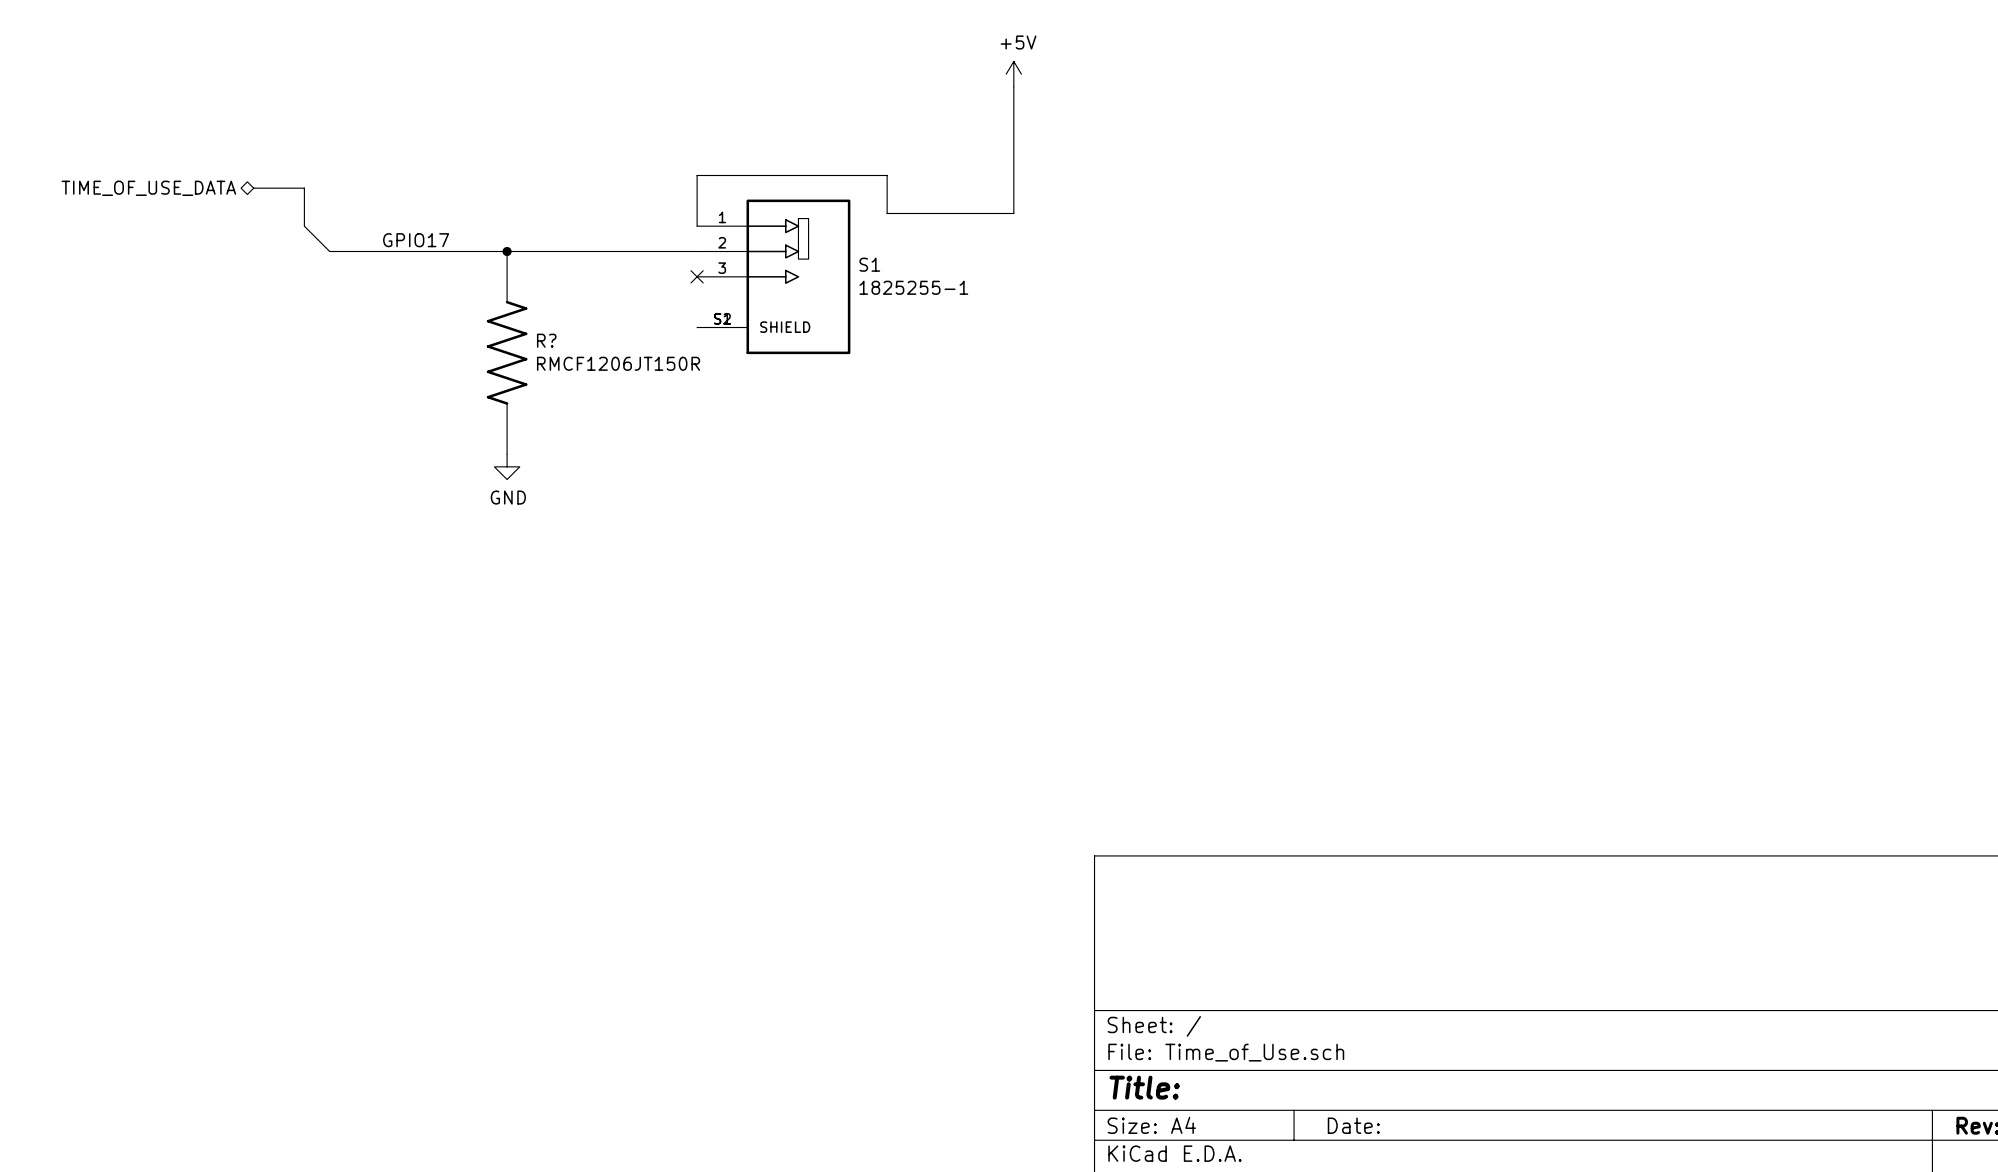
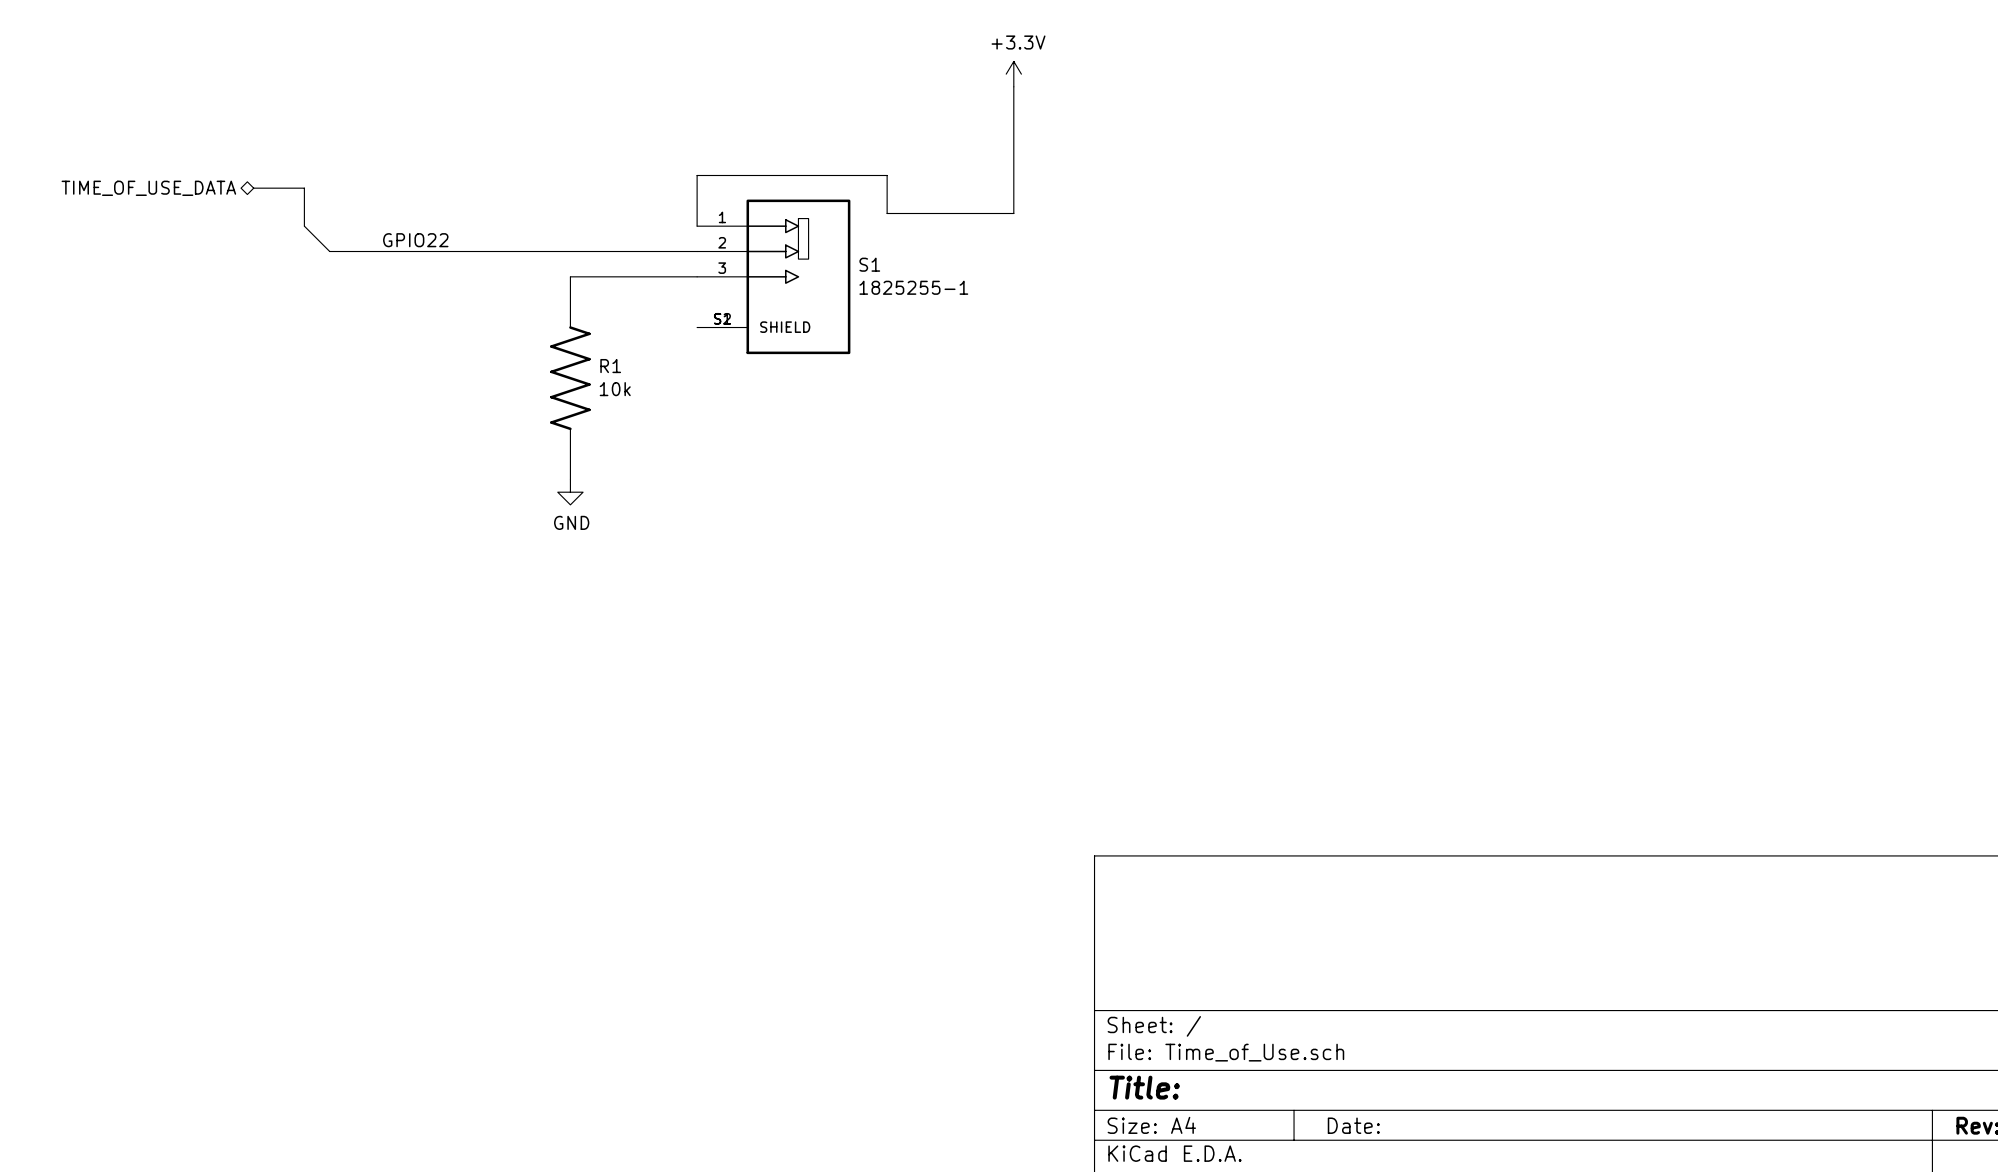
power symbol: +5V (1013, 74) -> +3.3V (1013, 74)
label: GPIO17 (416, 240) -> GPIO22 (415, 240)
junction: (507, 251) -> none
wire: none -> (570, 276) (697, 276)
no-connect mark: (697, 276) -> none
R?: RMCF1206JT150R (507, 352) -> none
R1: none -> 10k (570, 378)
power symbol position: GND (507, 466) -> GND (570, 492)

